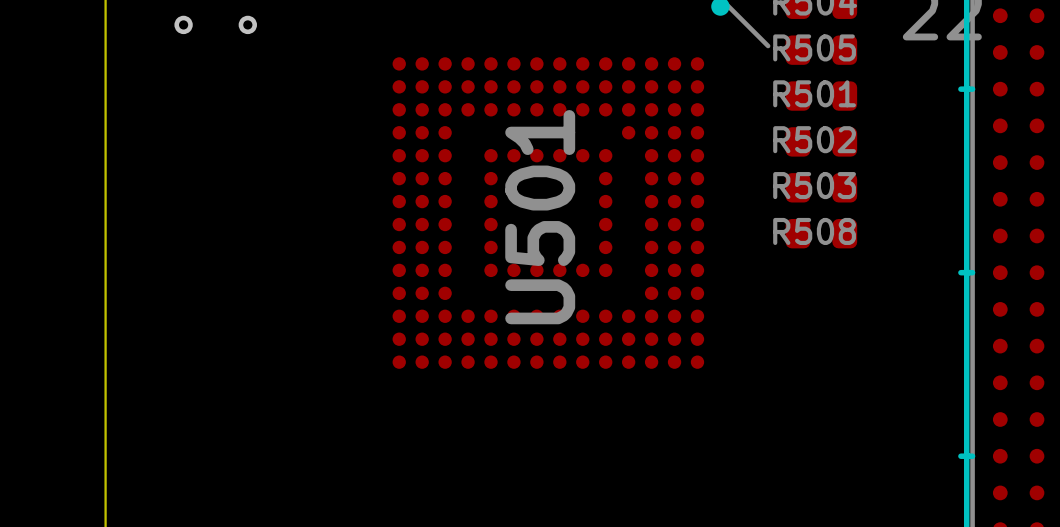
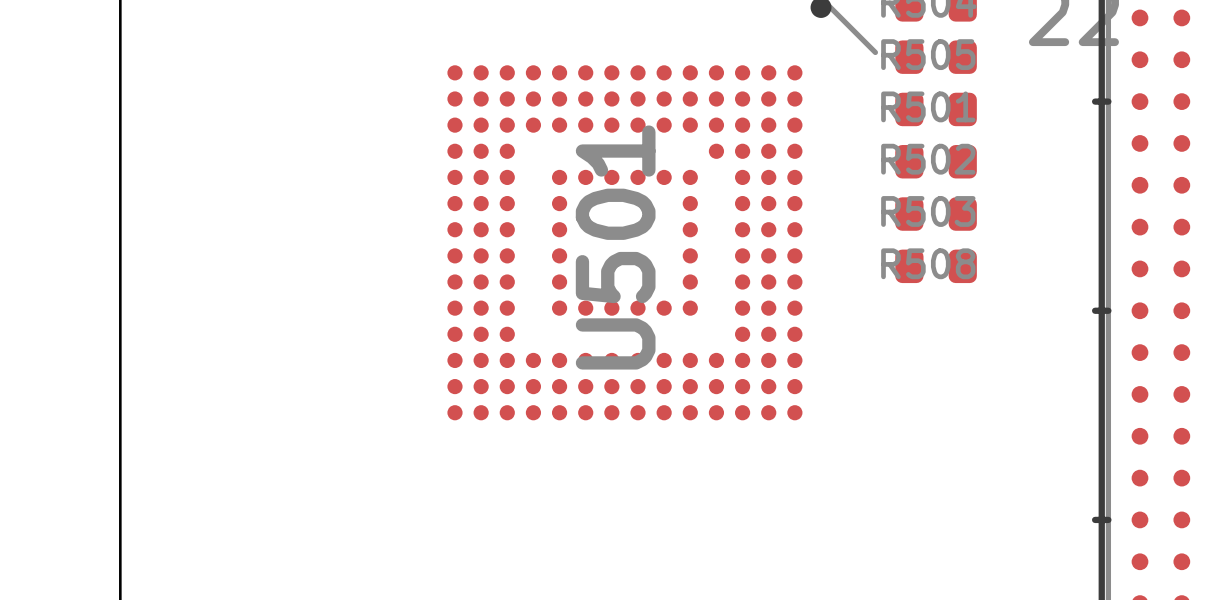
via: (183, 24) -> none
via: (247, 24) -> none

